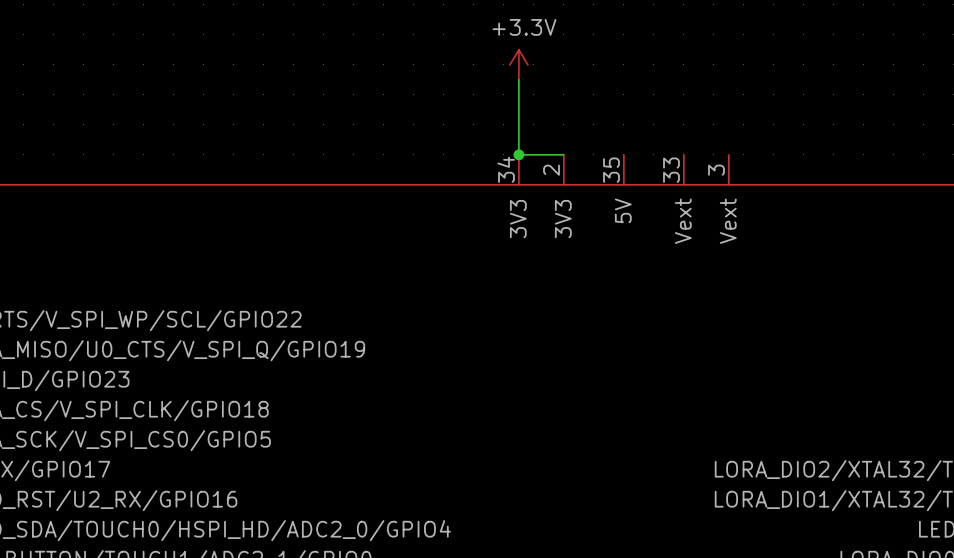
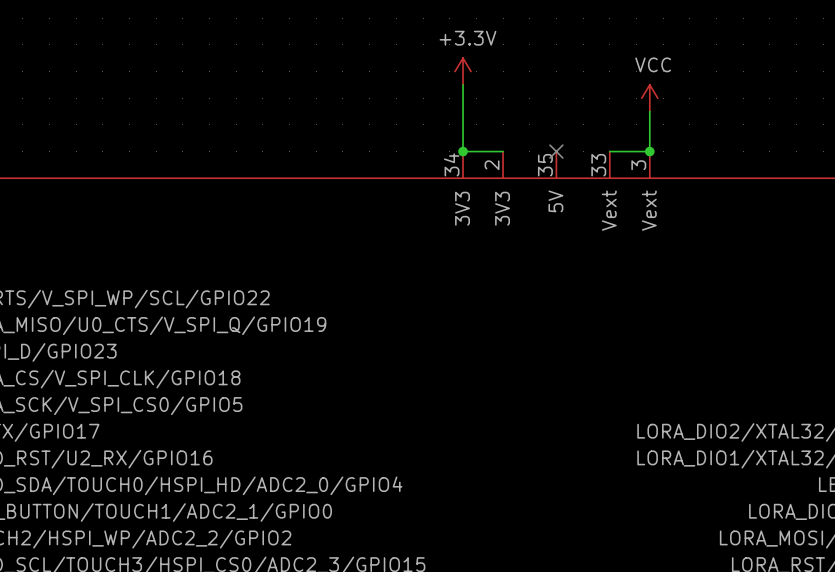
power symbol: none -> VCC (649, 98)
wire: none -> (649, 111) (649, 151) (609, 151)
no-connect mark: none -> (556, 151)
junction: none -> (649, 151)

